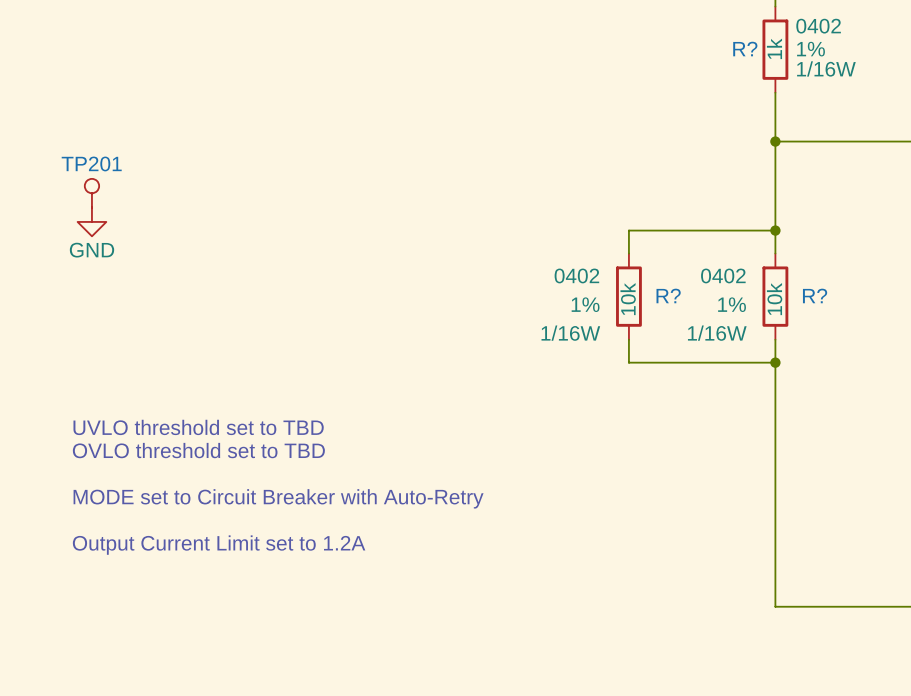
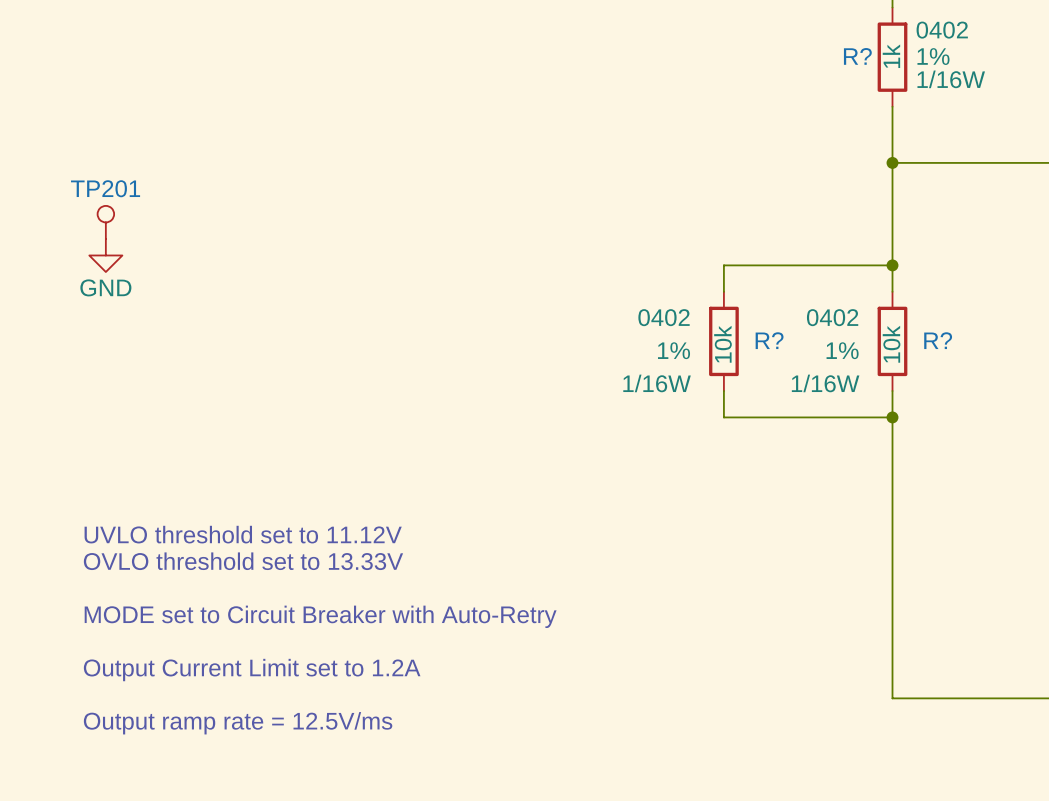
text: UVLO threshold set to TBD (198, 427) -> none
text: OVLO threshold set to TBD (198, 450) -> UVLO threshold set to 11.12V (243, 534)
text: MODE set to Circuit Breaker with Auto-Retry (278, 498) -> OVLO threshold set to 13.33V (243, 561)
text: Output Current Limit set to 1.2A (219, 545) -> MODE set to Circuit Breaker with Auto-Retry (320, 616)
text: none -> Output Current Limit set to 1.2A (252, 670)
text: none -> Output ramp rate = 12.5V/ms (238, 723)

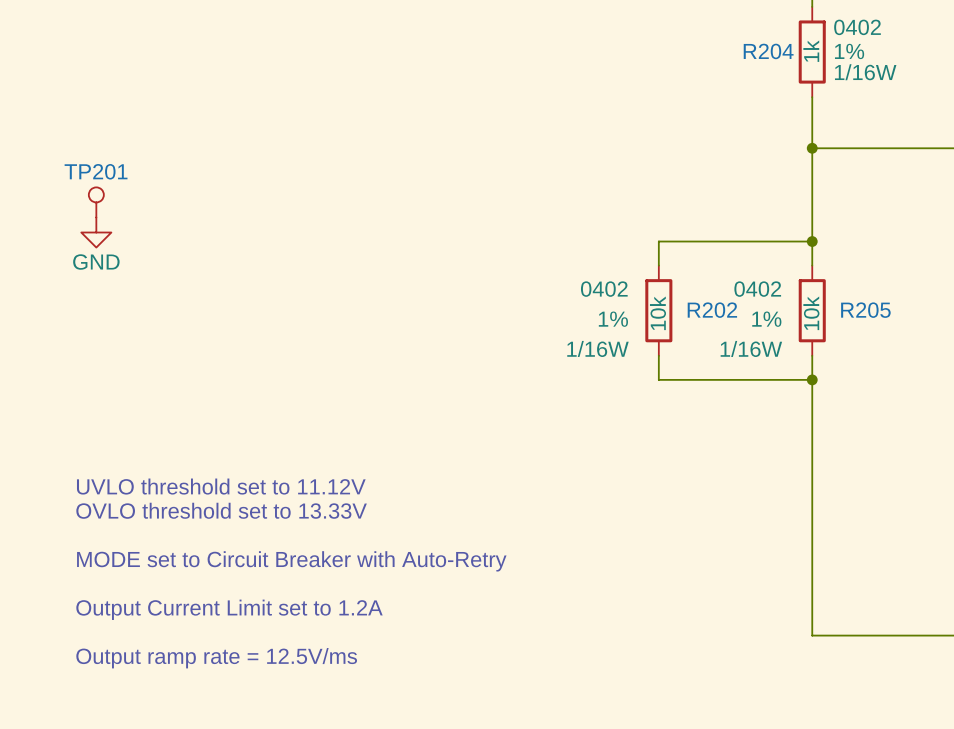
R? name: R? (857, 56) -> R204 (768, 51)
R? name: R? (769, 340) -> R202 (712, 310)
R? name: R? (938, 340) -> R205 (865, 310)

